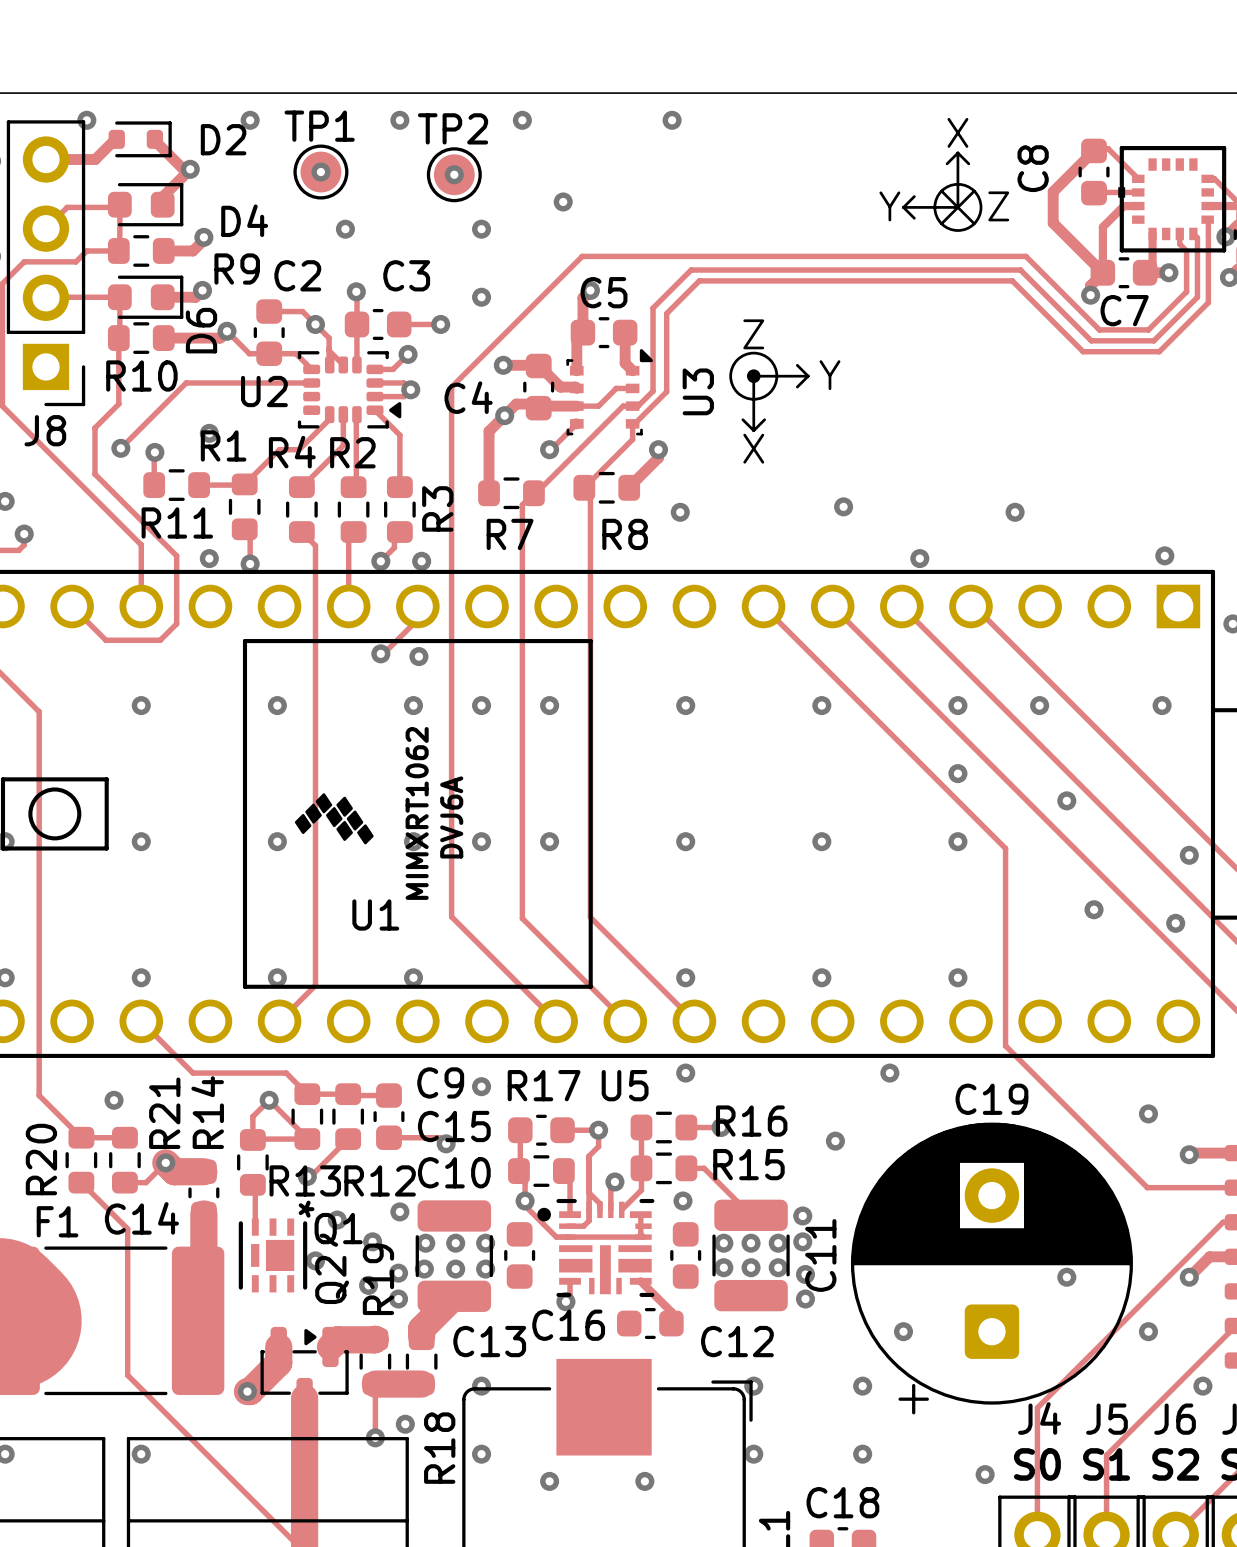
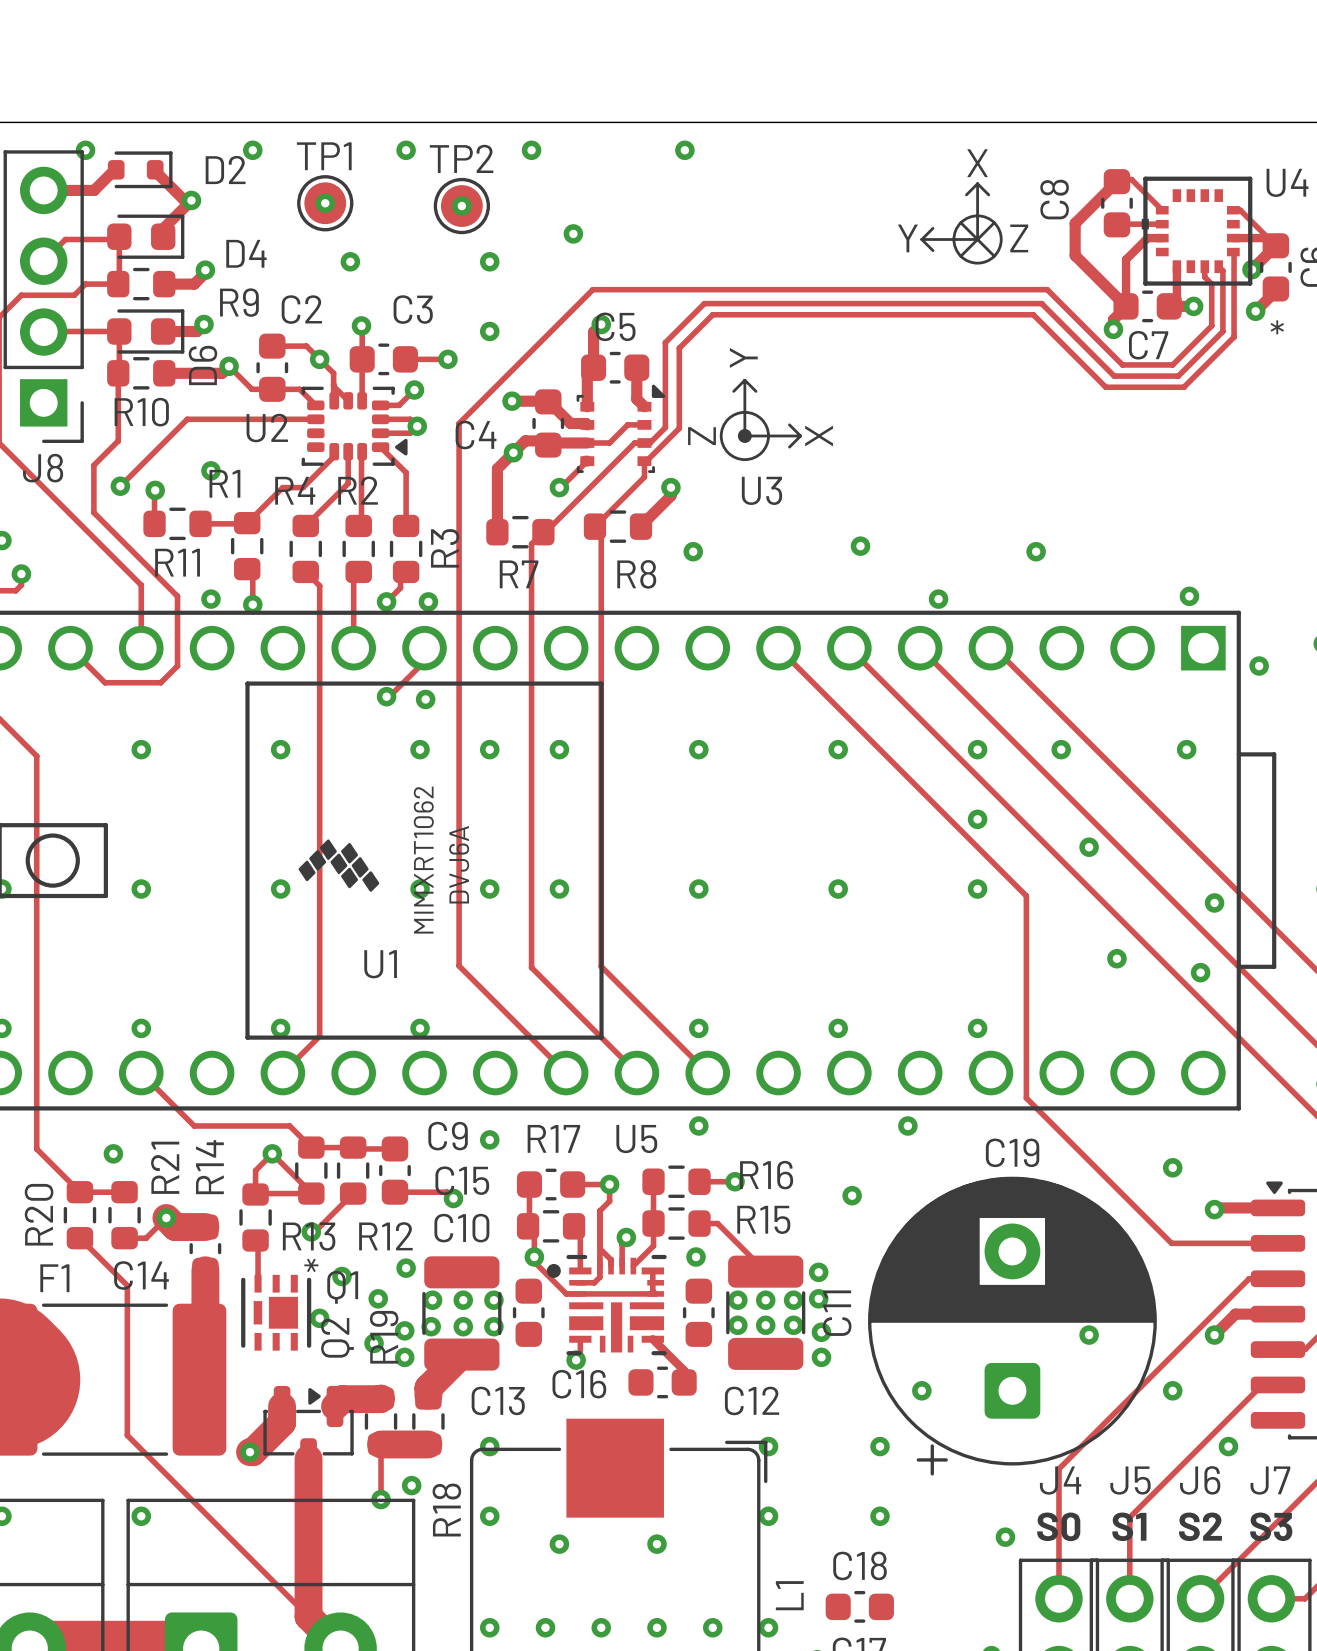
text rotation: 0° (753, 334) -> 90° counterclockwise (702, 436)
text position: Z (753, 334) -> Z (702, 436)
line: none -> (744, 380) (744, 435) (800, 435)
line: (797, 365) (808, 376) -> (789, 424) (800, 435)
text rotation: 0° (829, 375) -> 90° counterclockwise (743, 357)
text position: Y (829, 375) -> Y (743, 357)
drawing position: (753, 376) -> (744, 435)
drawing position: (753, 376) -> (744, 435)
line: (808, 376) (797, 387) -> (800, 435) (789, 447)
line: (808, 376) (753, 376) (753, 430) -> none
U3 name rotation: 0° (698, 391) -> 90° clockwise (762, 490)
U3 name position: U3 (698, 391) -> U3 (762, 490)
line: (742, 419) (753, 430) -> (744, 380) (756, 391)
line: (764, 419) (753, 430) -> (744, 380) (733, 391)
text rotation: 0° (753, 448) -> 90° counterclockwise (819, 436)
text position: X (753, 448) -> X (819, 436)

